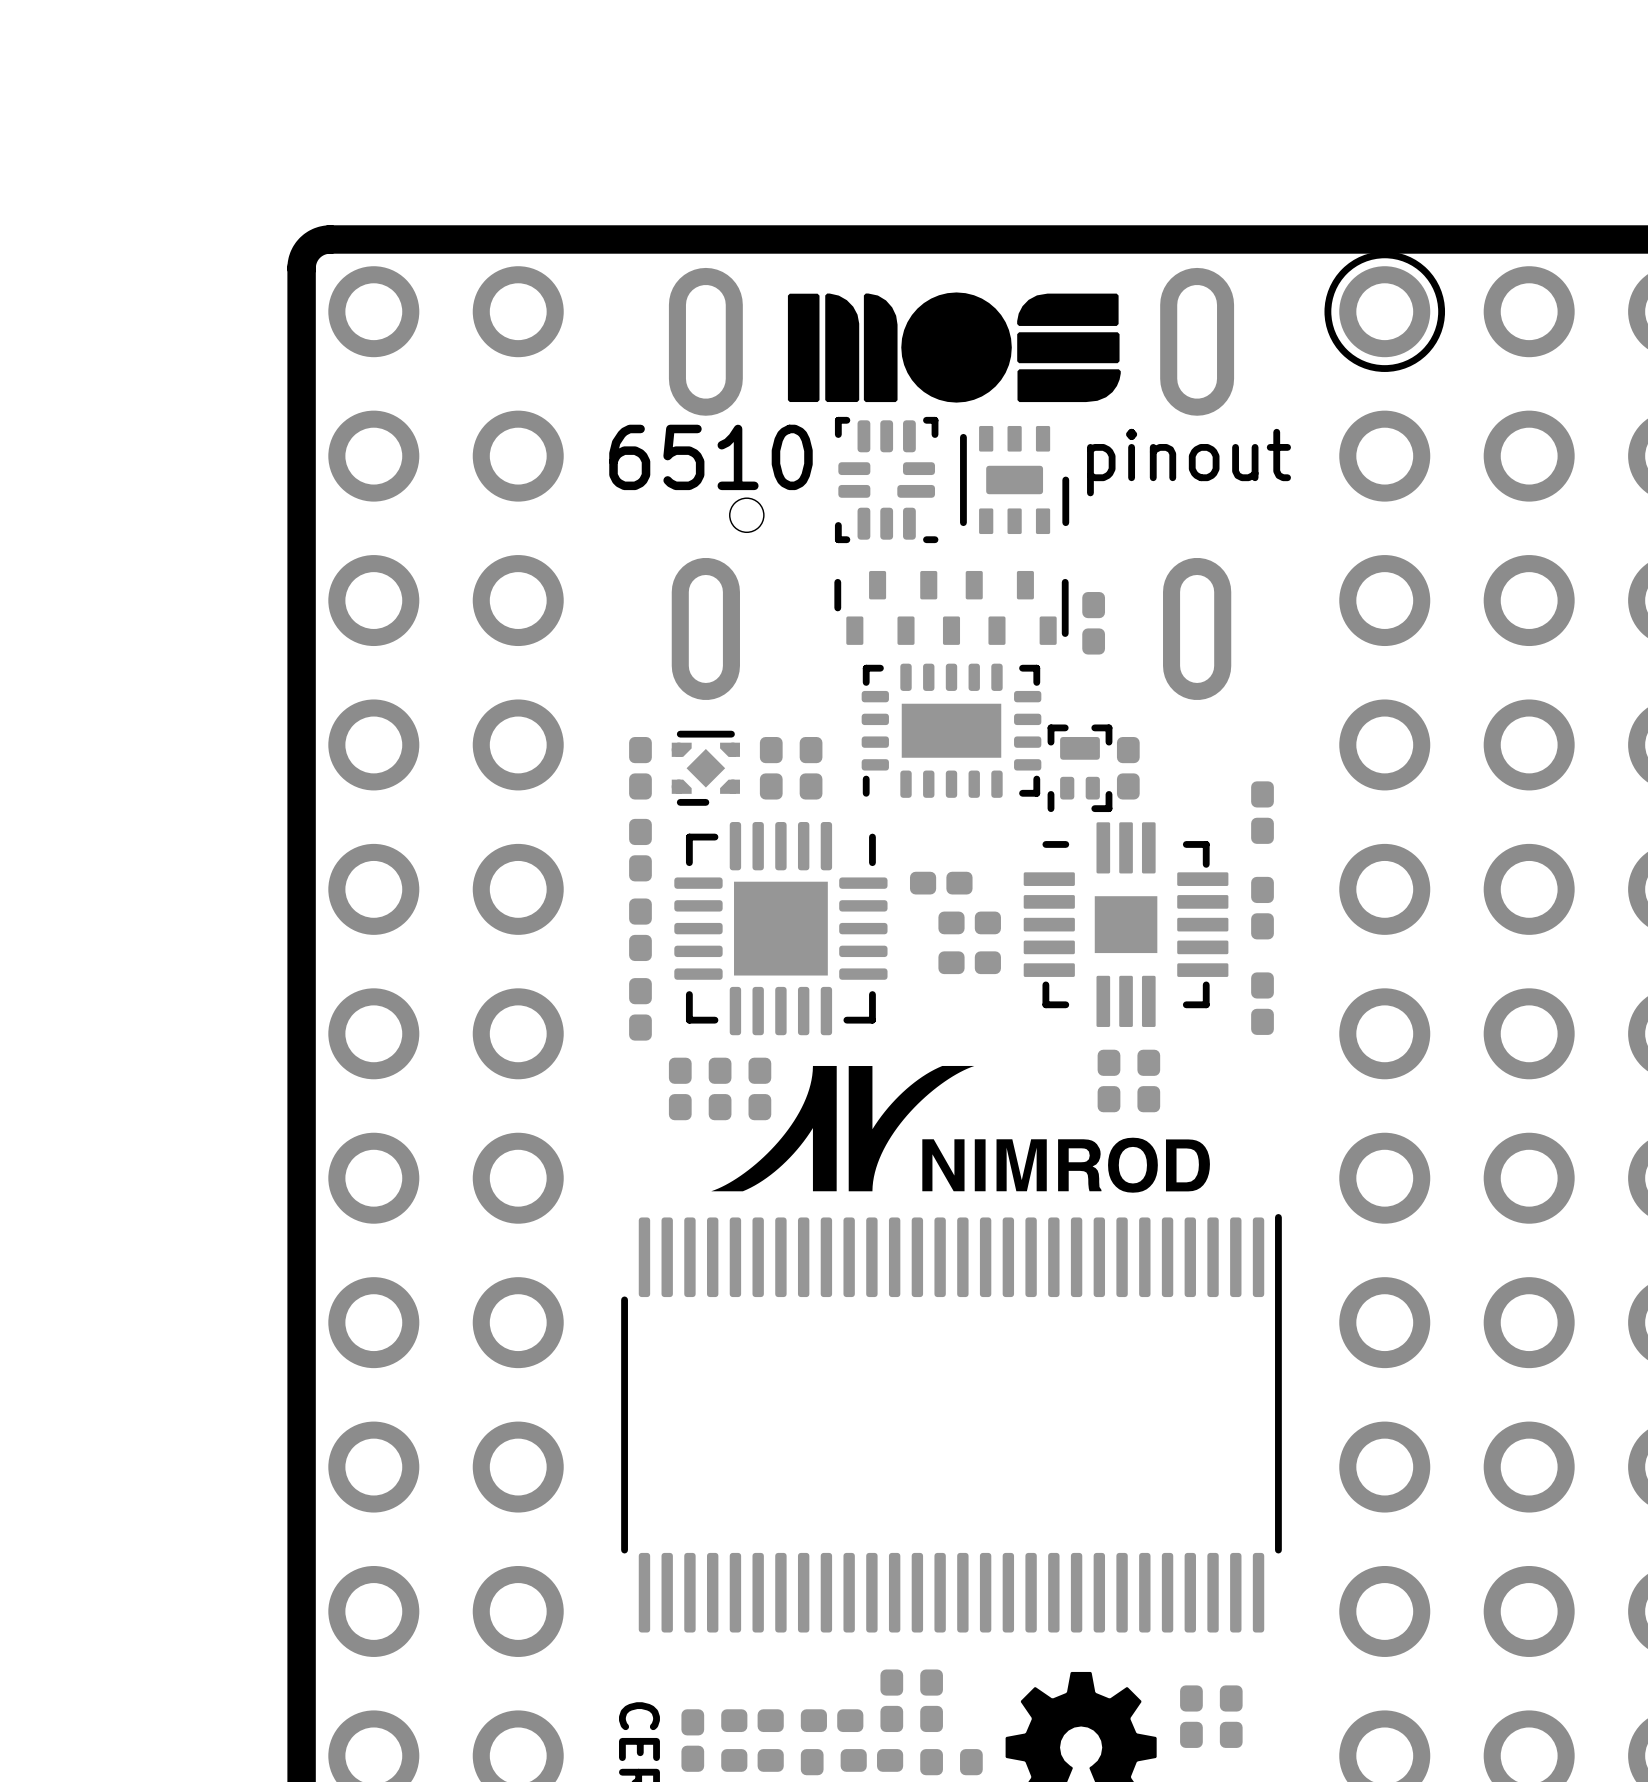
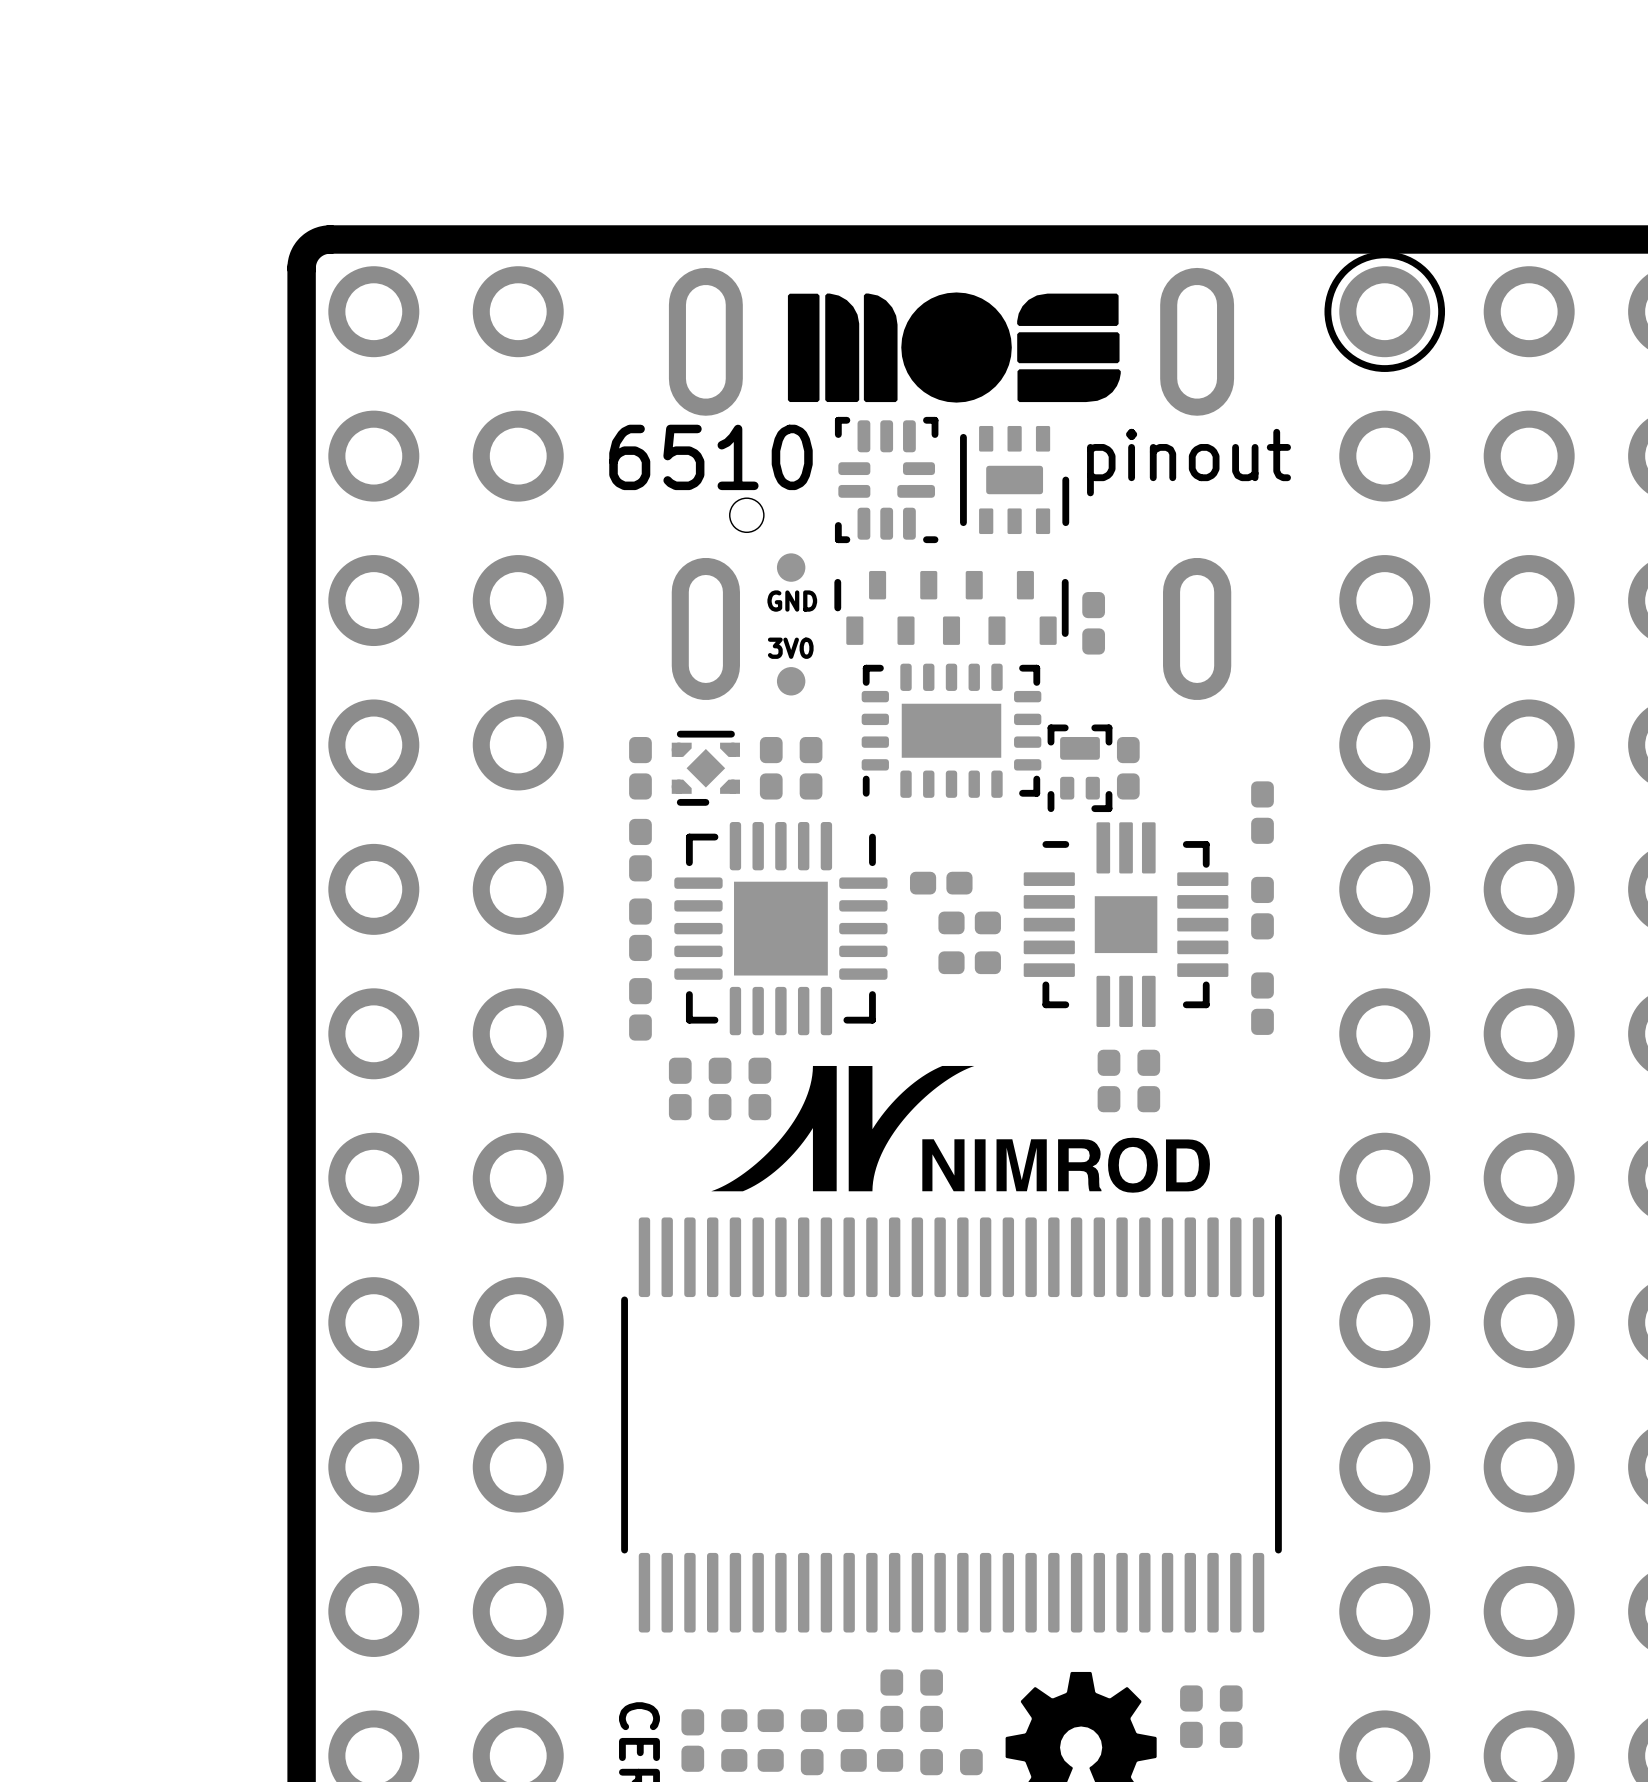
part: none -> (791, 567)
text: none -> GND (792, 601)
text: none -> 3V0 (790, 648)
part: none -> (791, 681)

